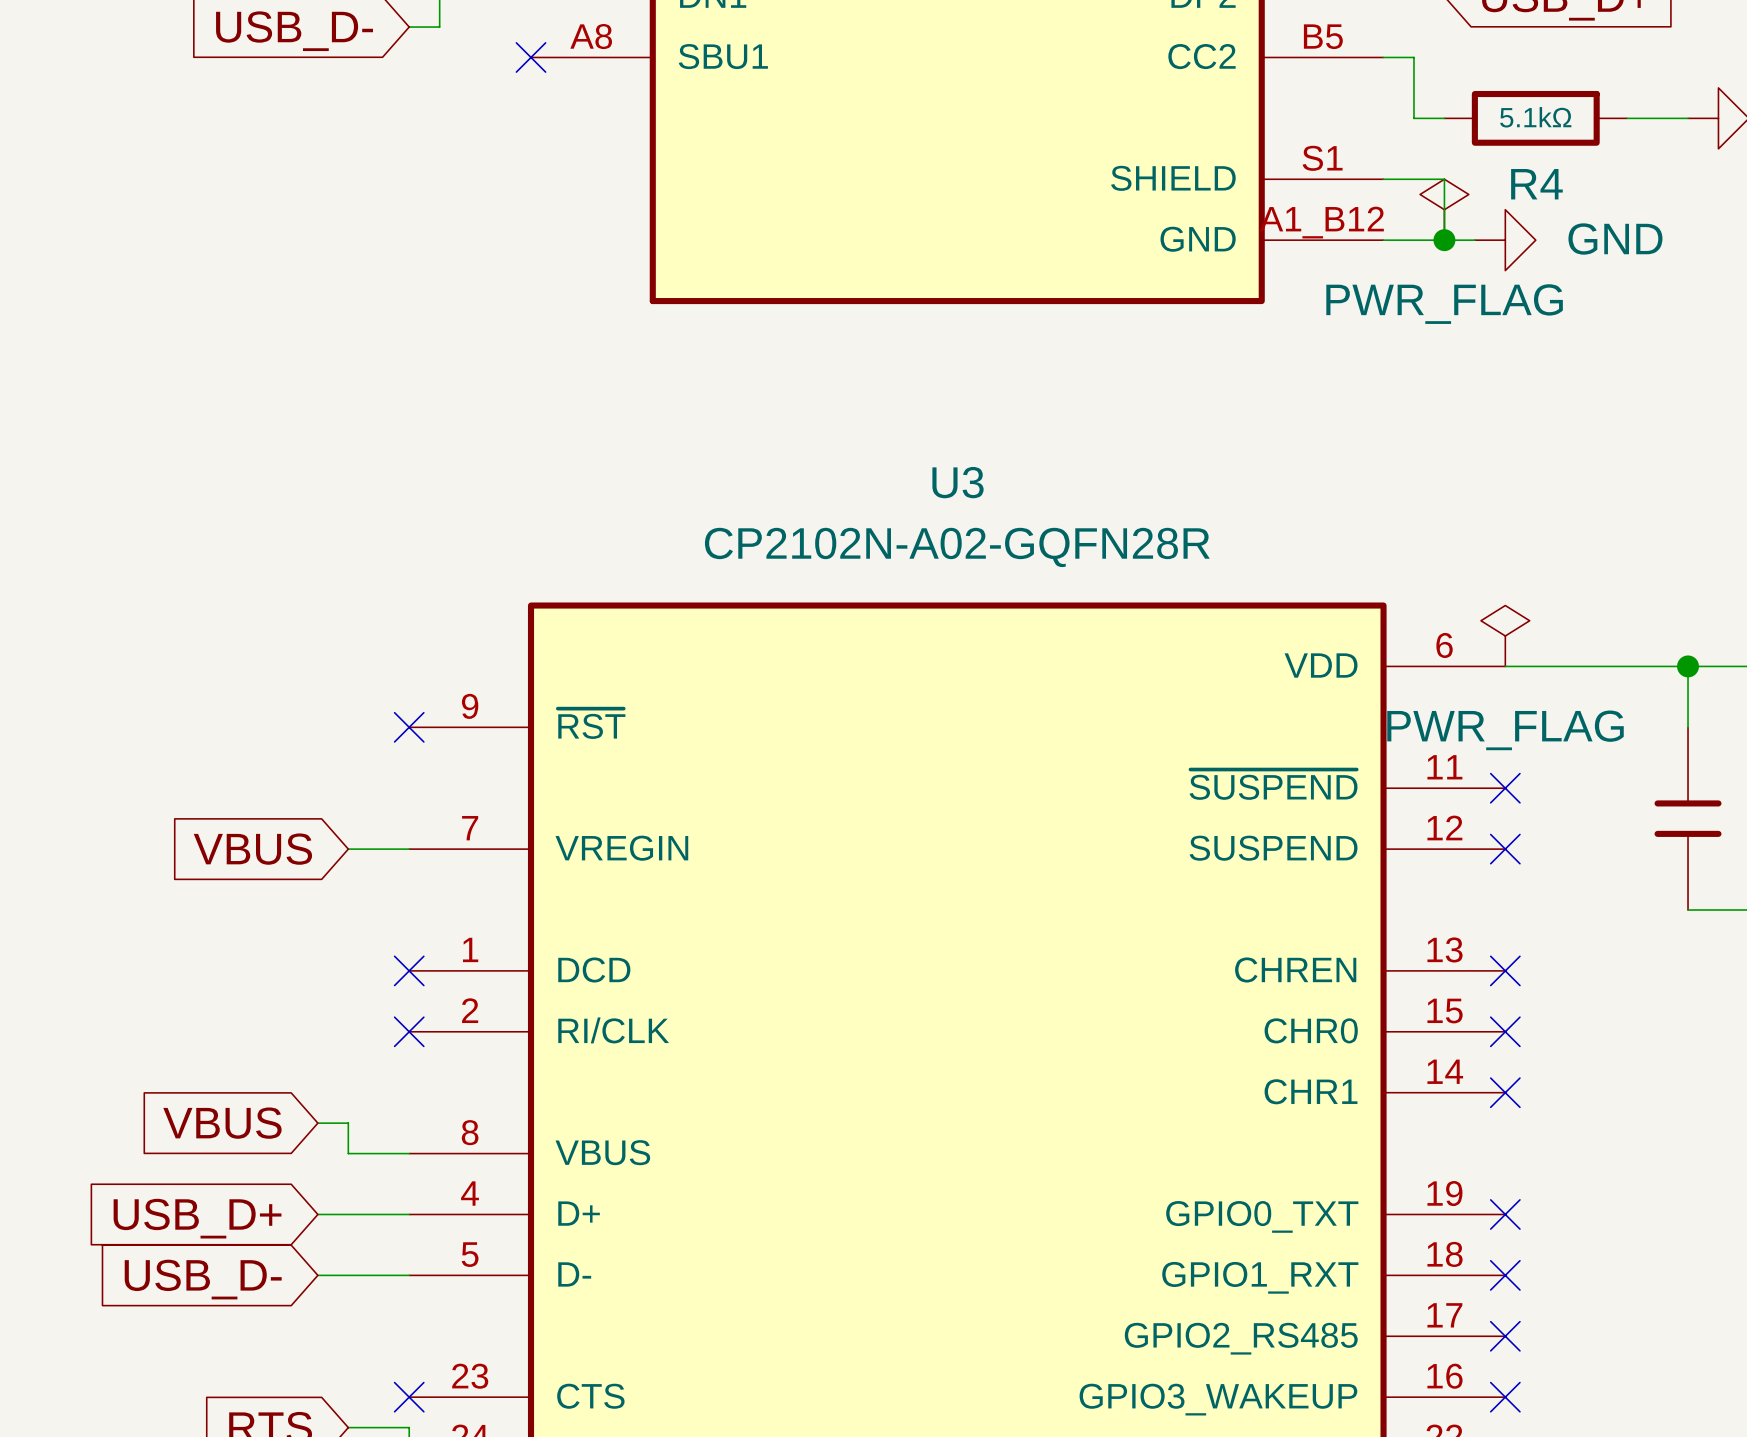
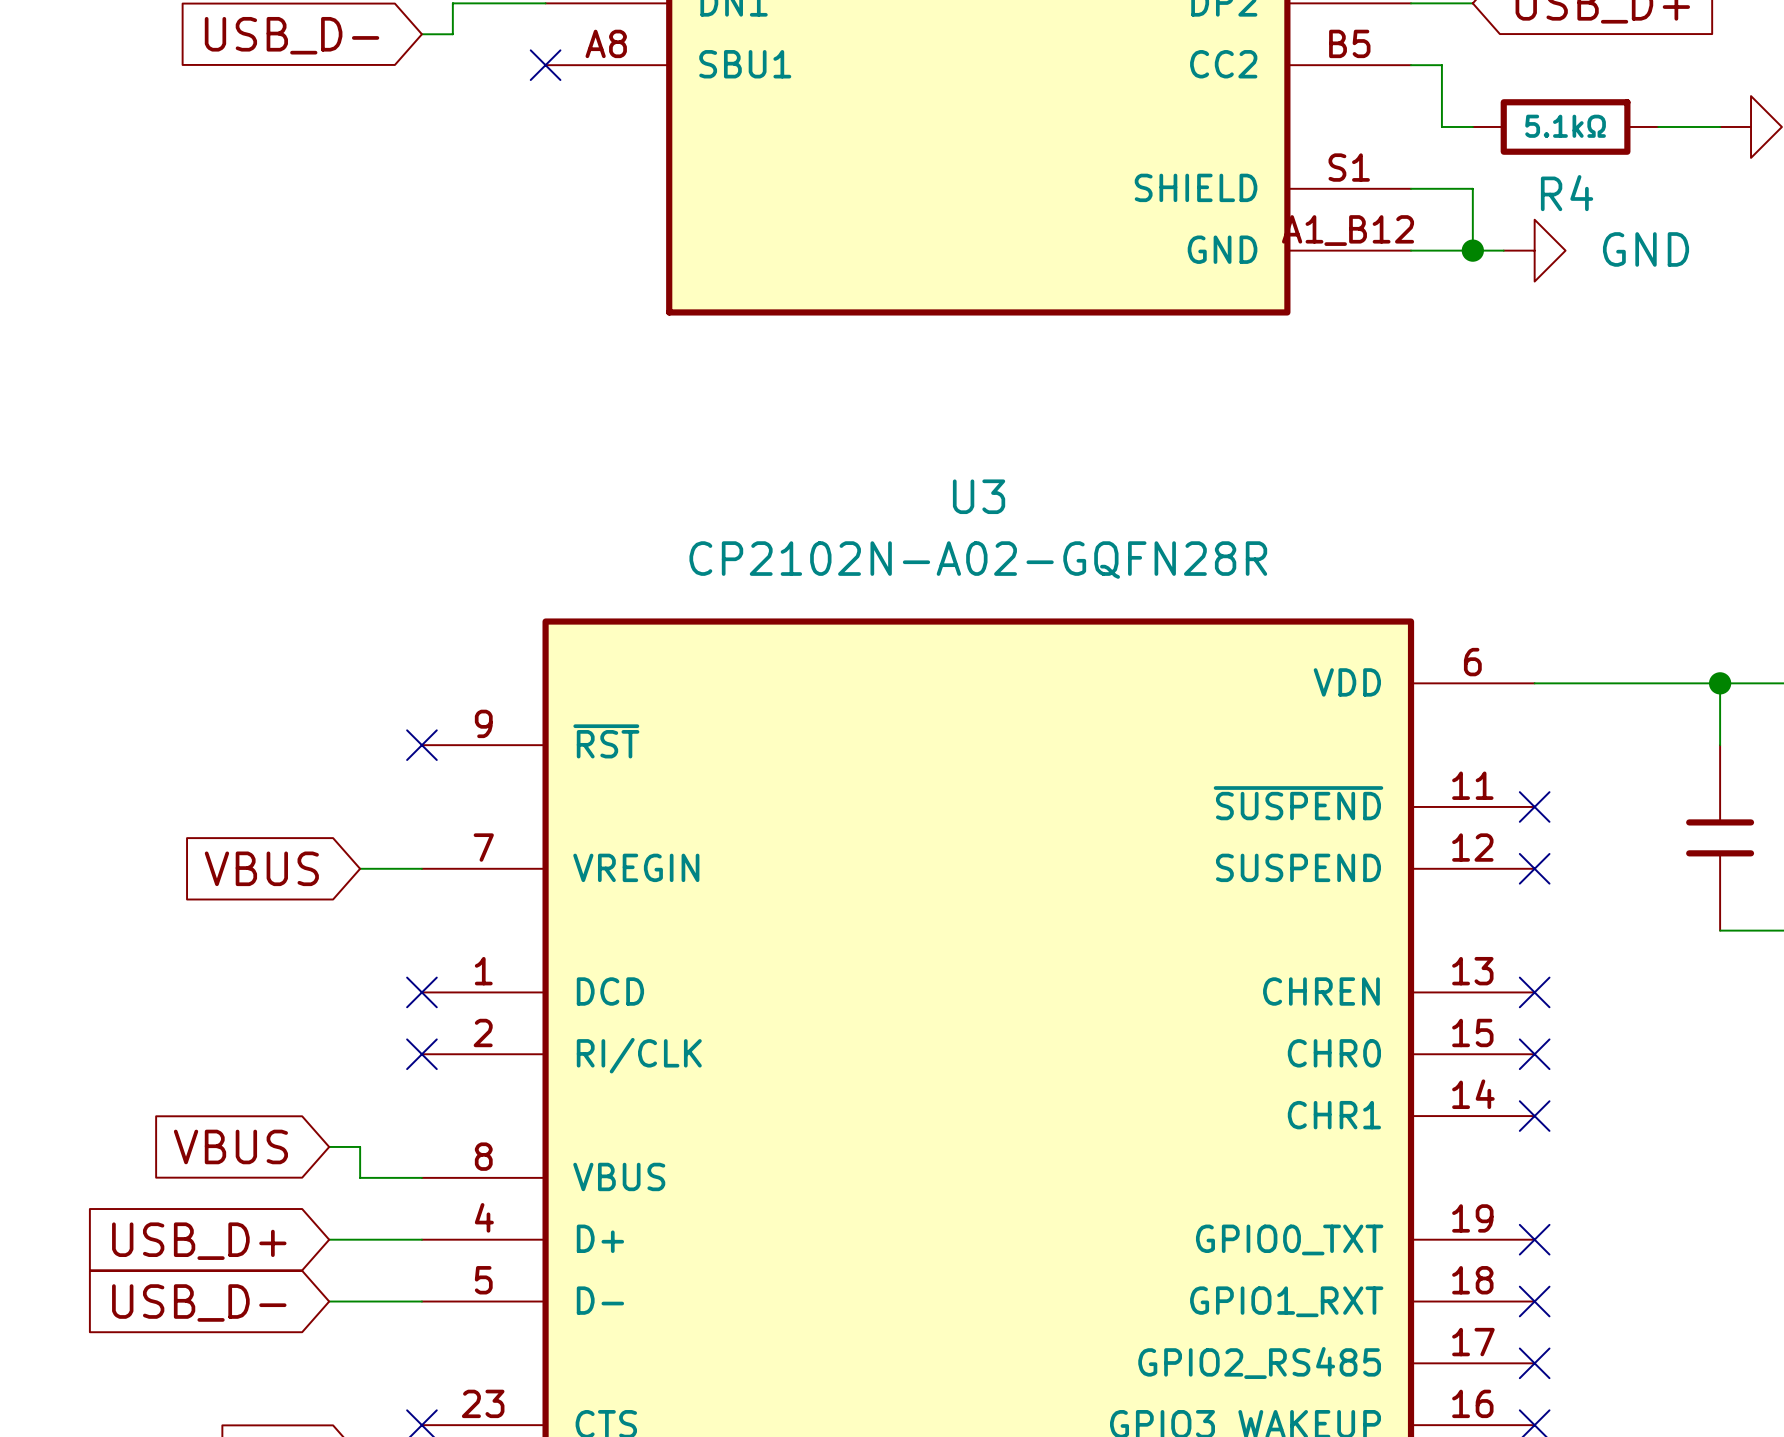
power symbol: PWR_FLAG (1444, 209) -> none
power symbol: PWR_FLAG (1505, 635) -> none

